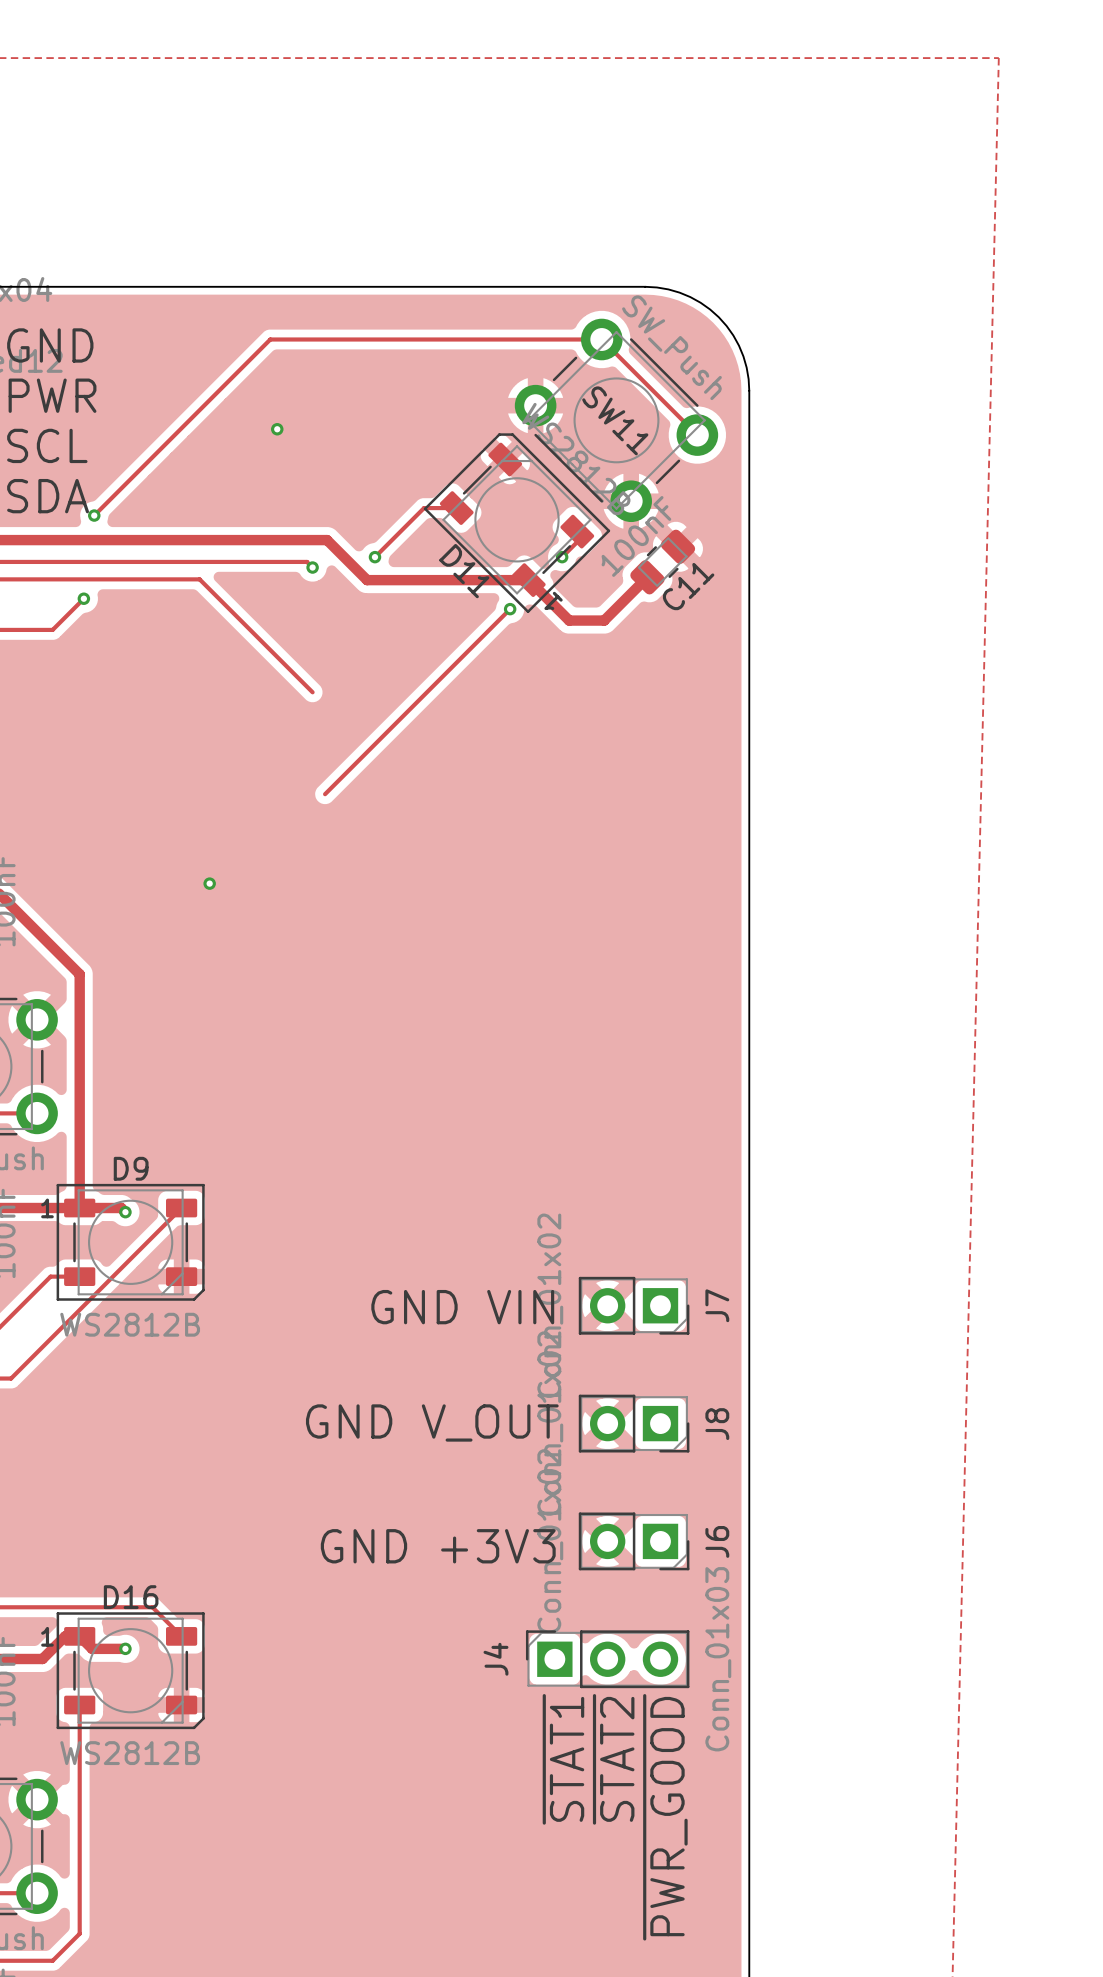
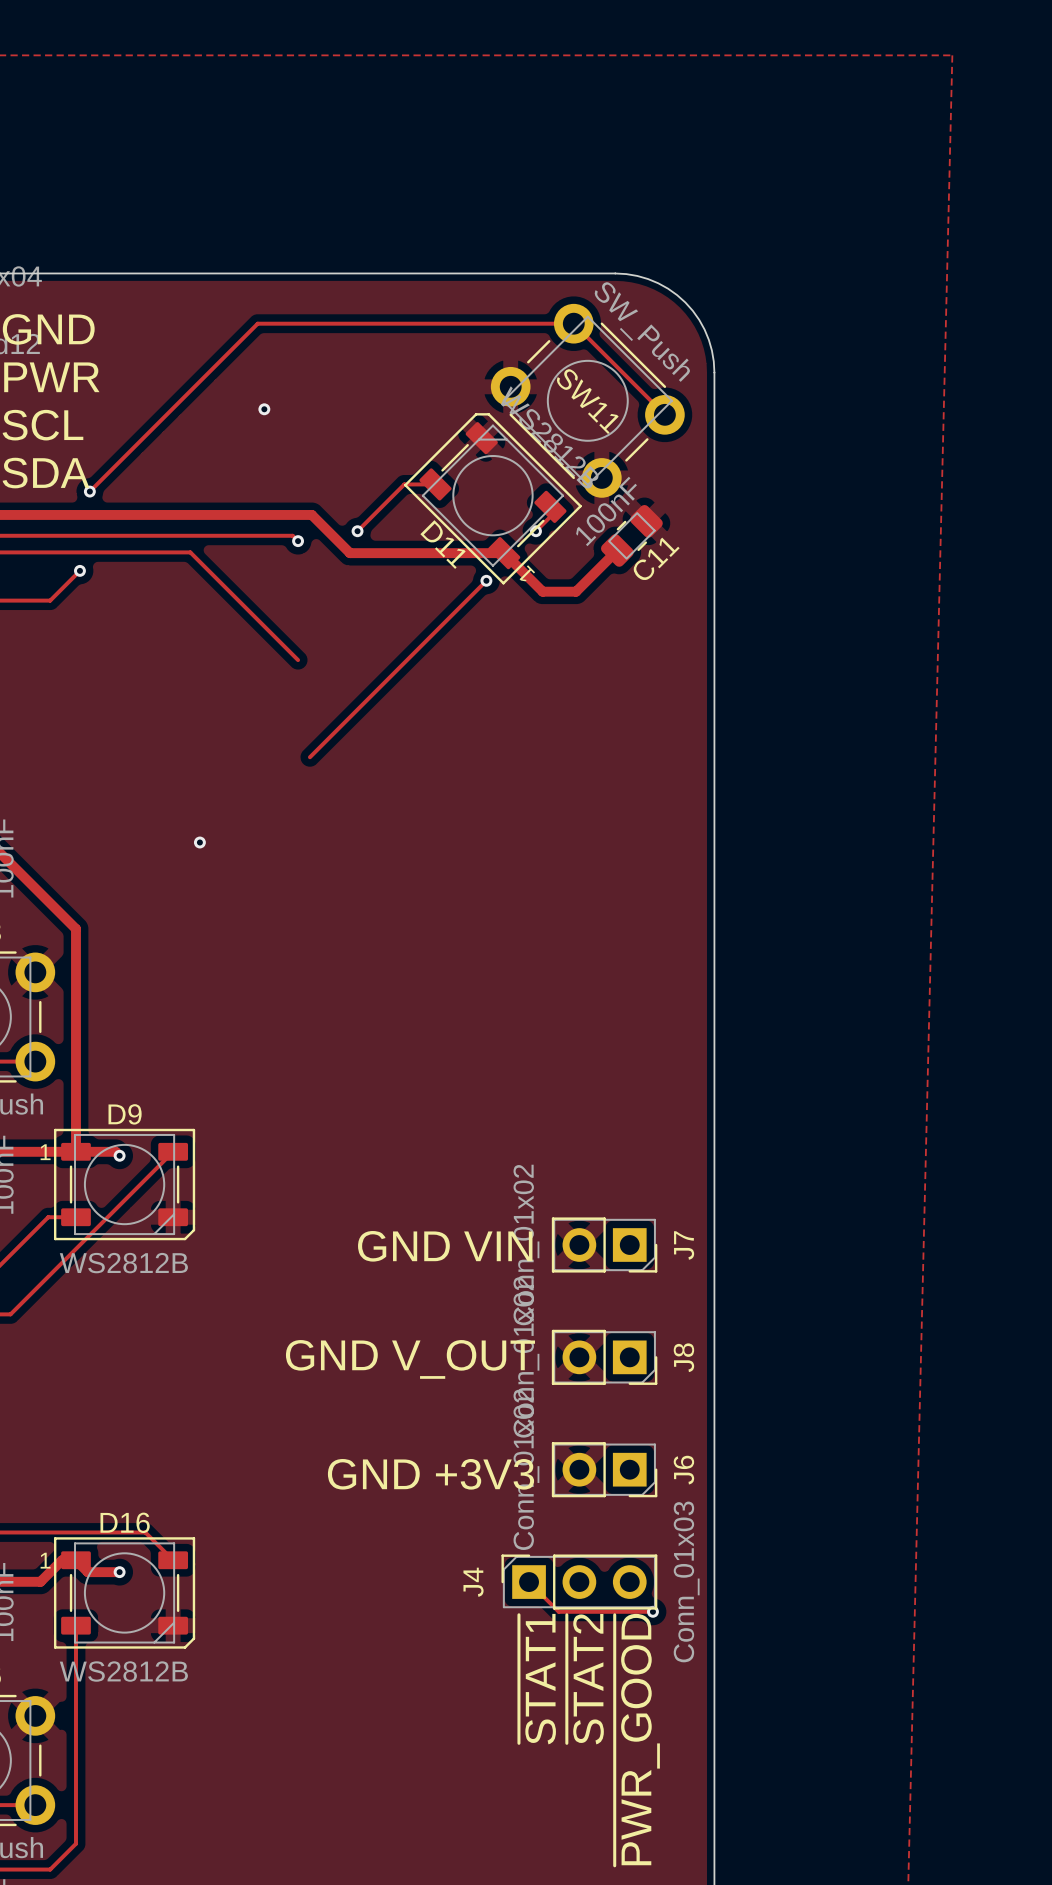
track: none -> (529, 1582) (558, 1611) (652, 1611)
via: none -> (652, 1611)

